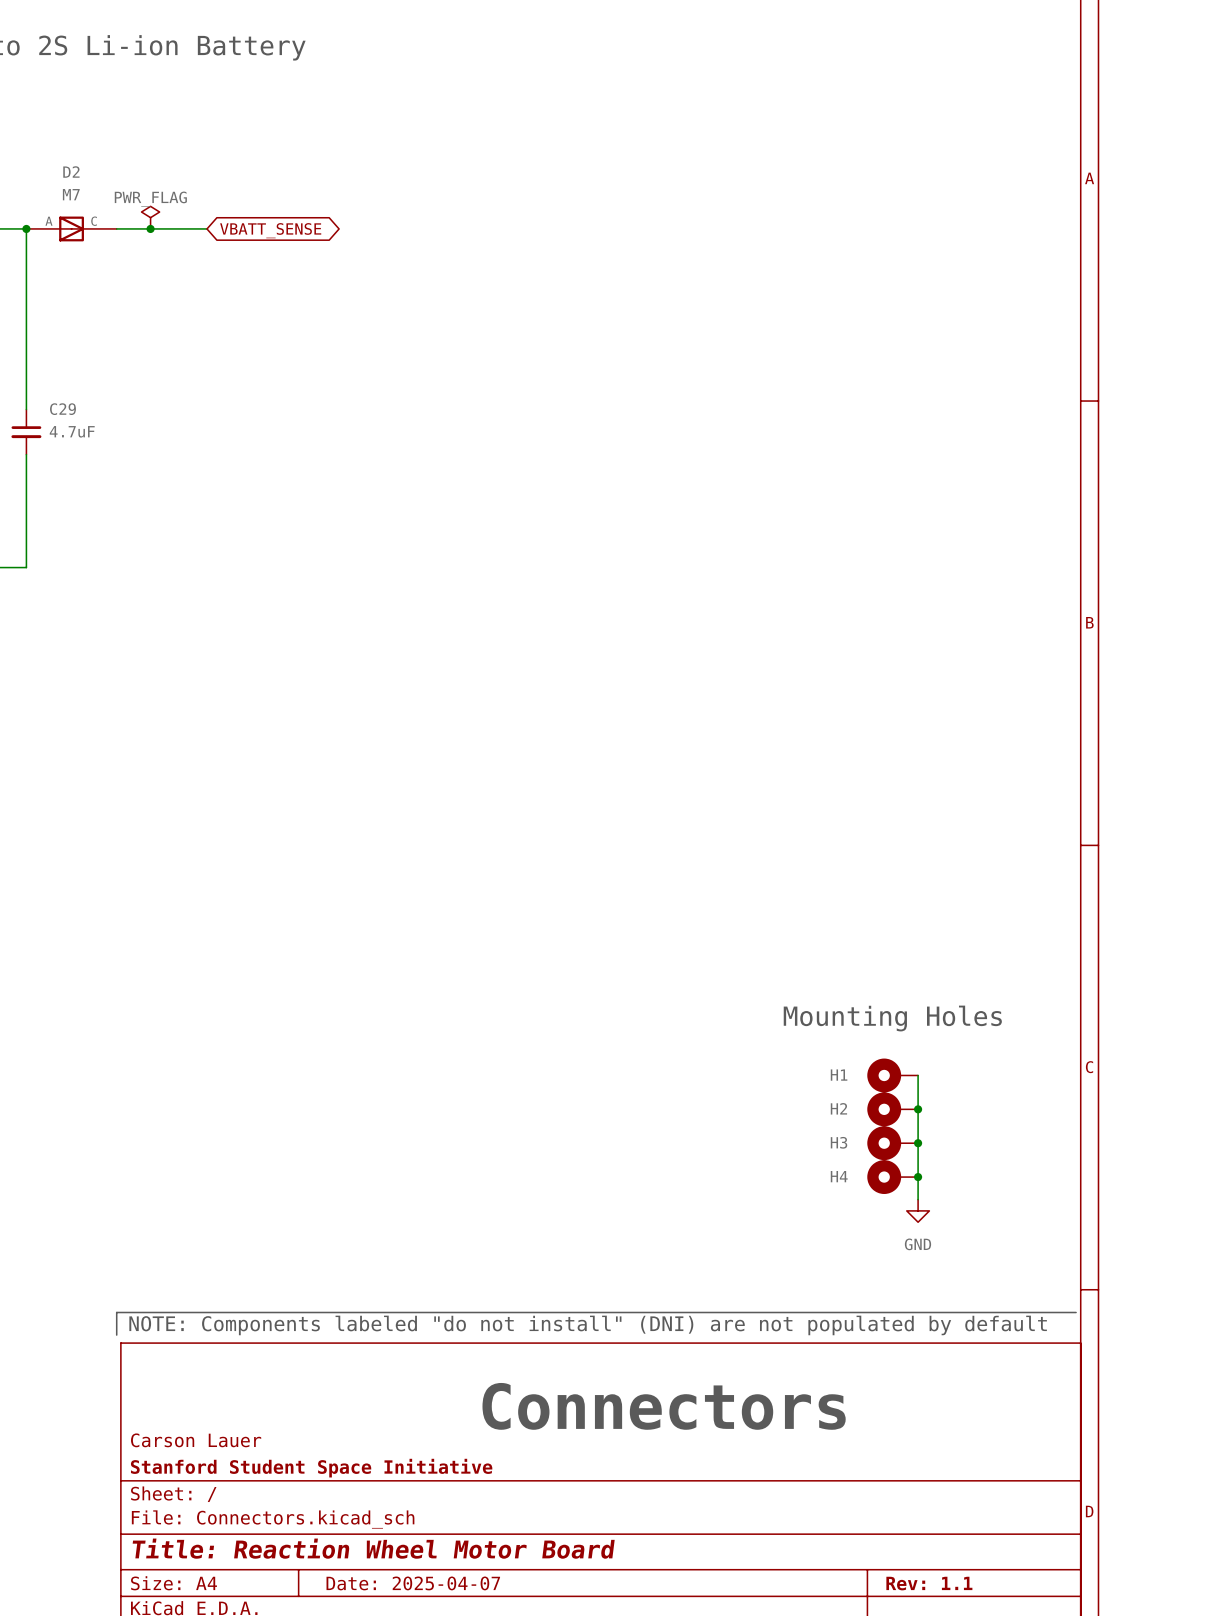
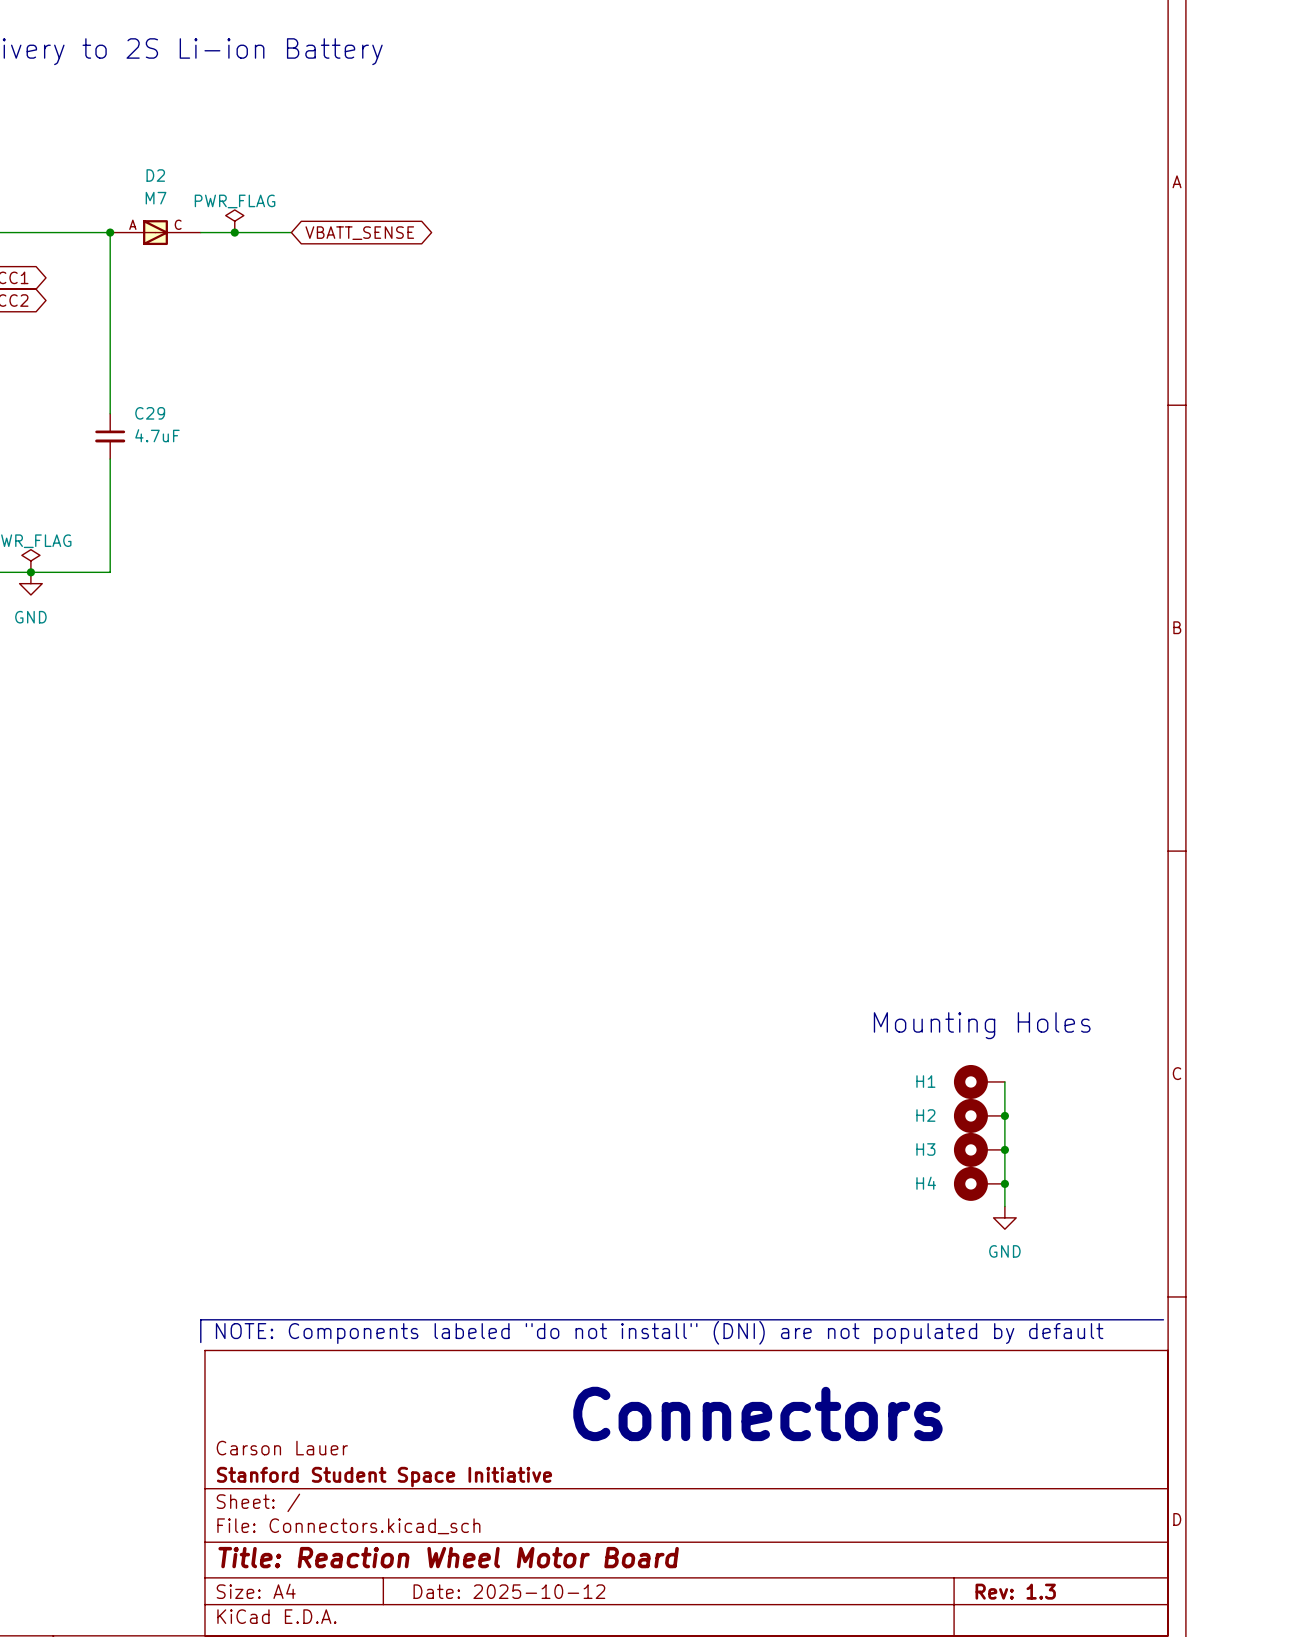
title block: Date: 2025-04-07 (413, 1583) -> Date: 2025-10-12 (509, 1591)
title block: Rev: 1.1 (929, 1583) -> Rev: 1.3 (1015, 1591)

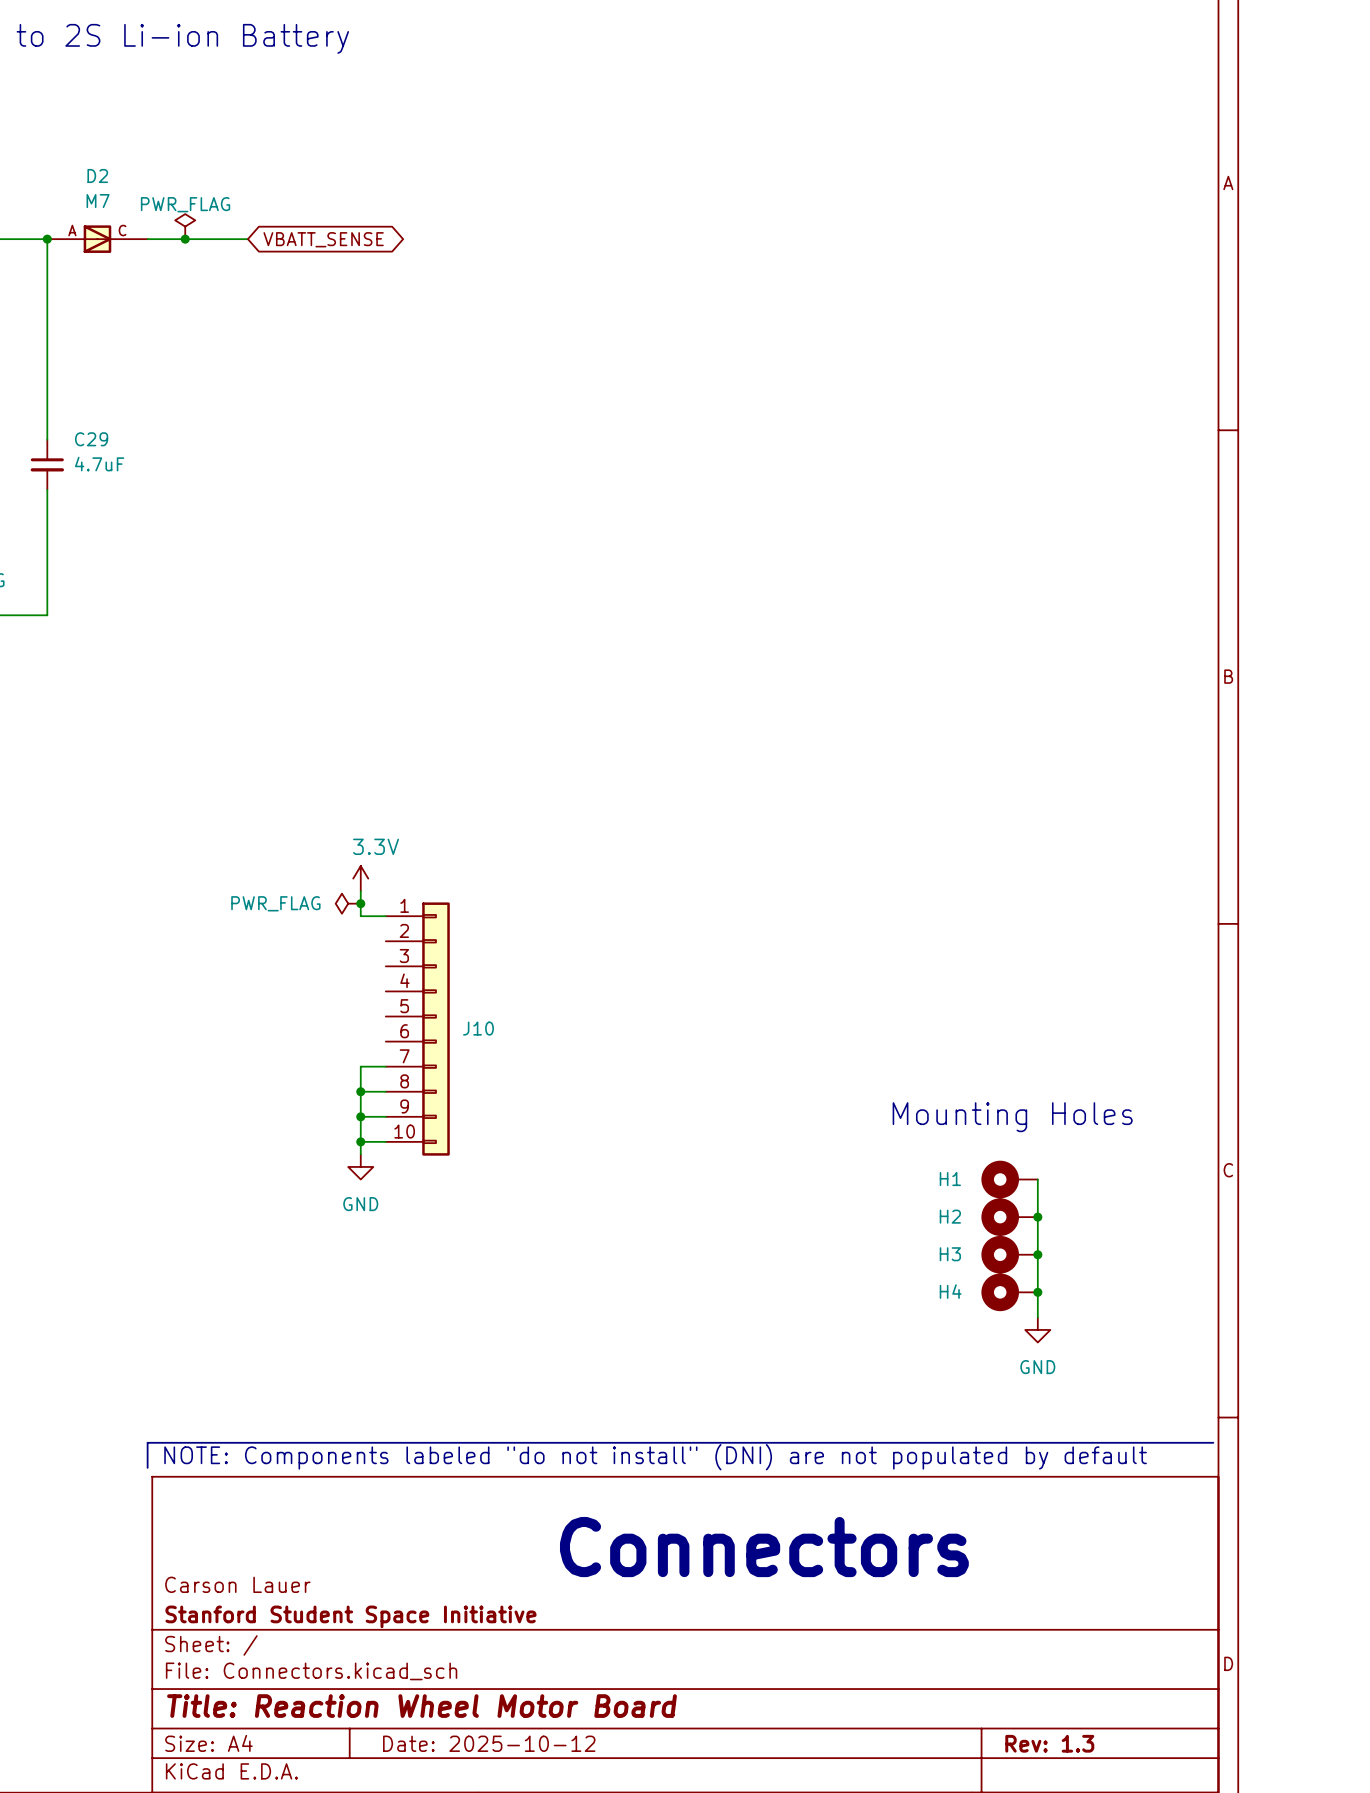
power symbol: none -> 3.3V (360, 878)
wire: none -> (360, 891) (360, 916) (385, 916)
power symbol: none -> PWR_FLAG (348, 903)
junction: none -> (360, 903)
J10: none -> (417, 1029)
wire: none -> (385, 1066) (360, 1066) (360, 1154)
wire: none -> (360, 1091) (385, 1091)
junction: none -> (360, 1091)
wire: none -> (360, 1116) (385, 1116)
junction: none -> (360, 1116)
wire: none -> (360, 1141) (385, 1141)
junction: none -> (360, 1141)
power symbol: none -> GND (360, 1166)

